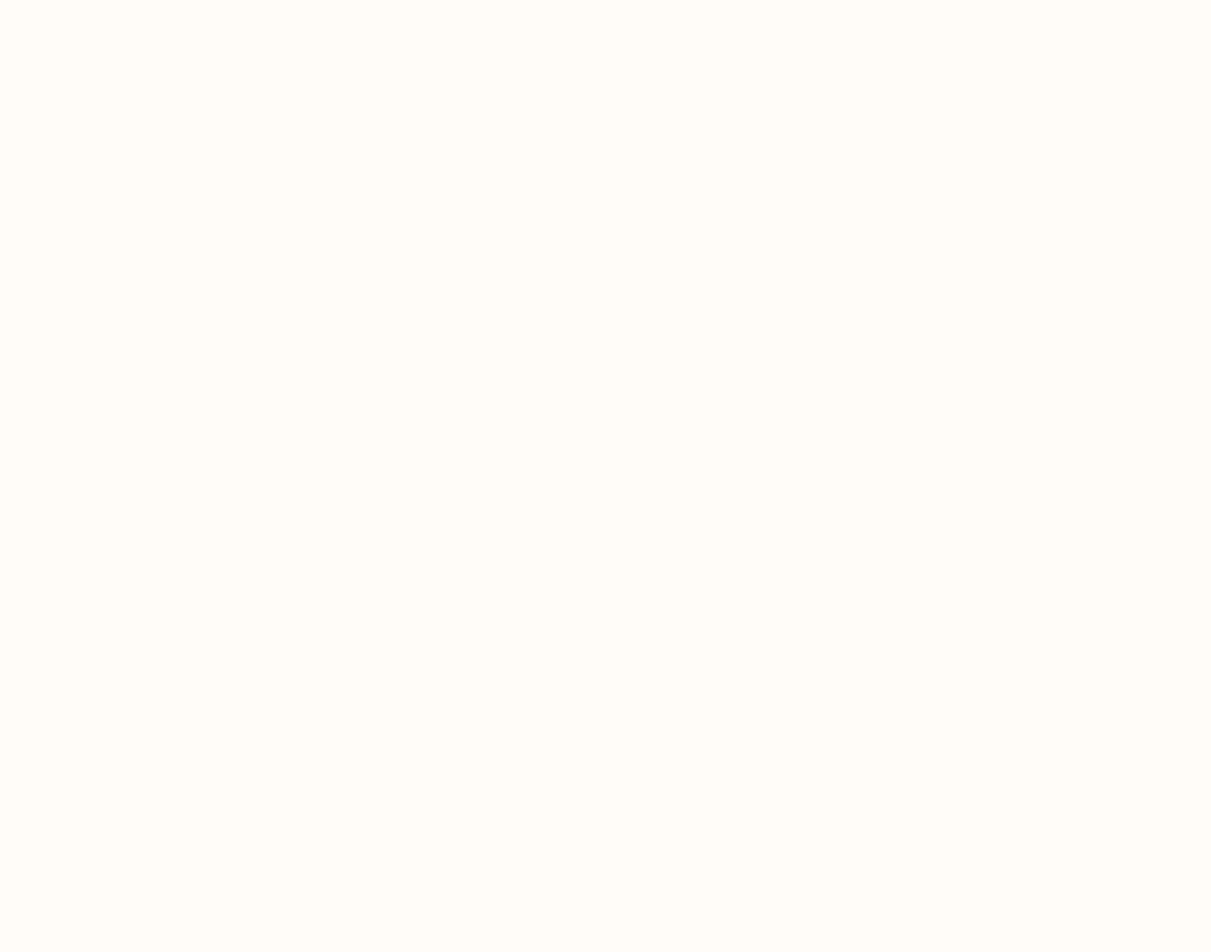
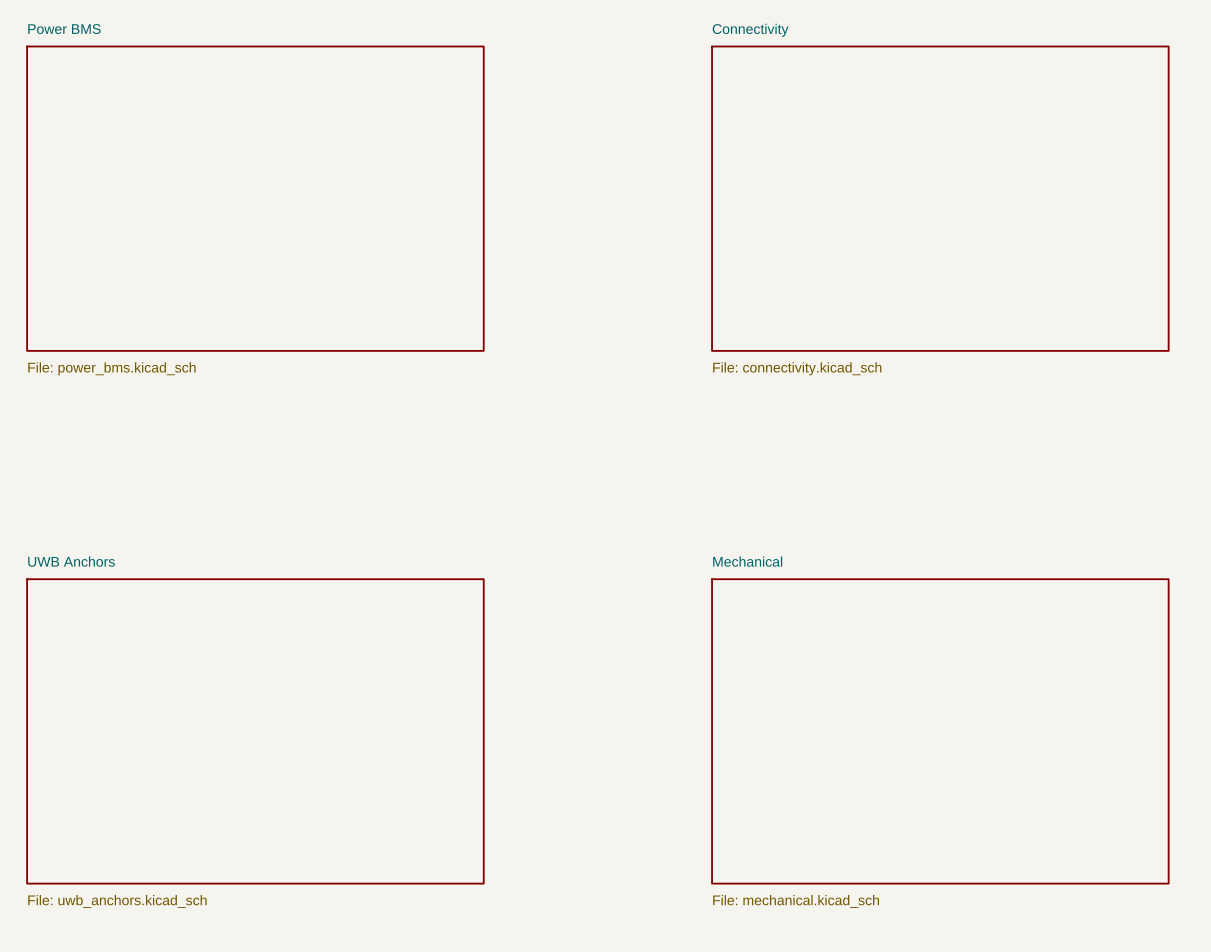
sheet Power BMS: none -> File: power_bms.kicad_sch (255, 198)
sheet Connectivity: none -> File: connectivity.kicad_sch (940, 198)
sheet UWB Anchors: none -> File: uwb_anchors.kicad_sch (255, 731)
sheet Mechanical: none -> File: mechanical.kicad_sch (940, 731)

